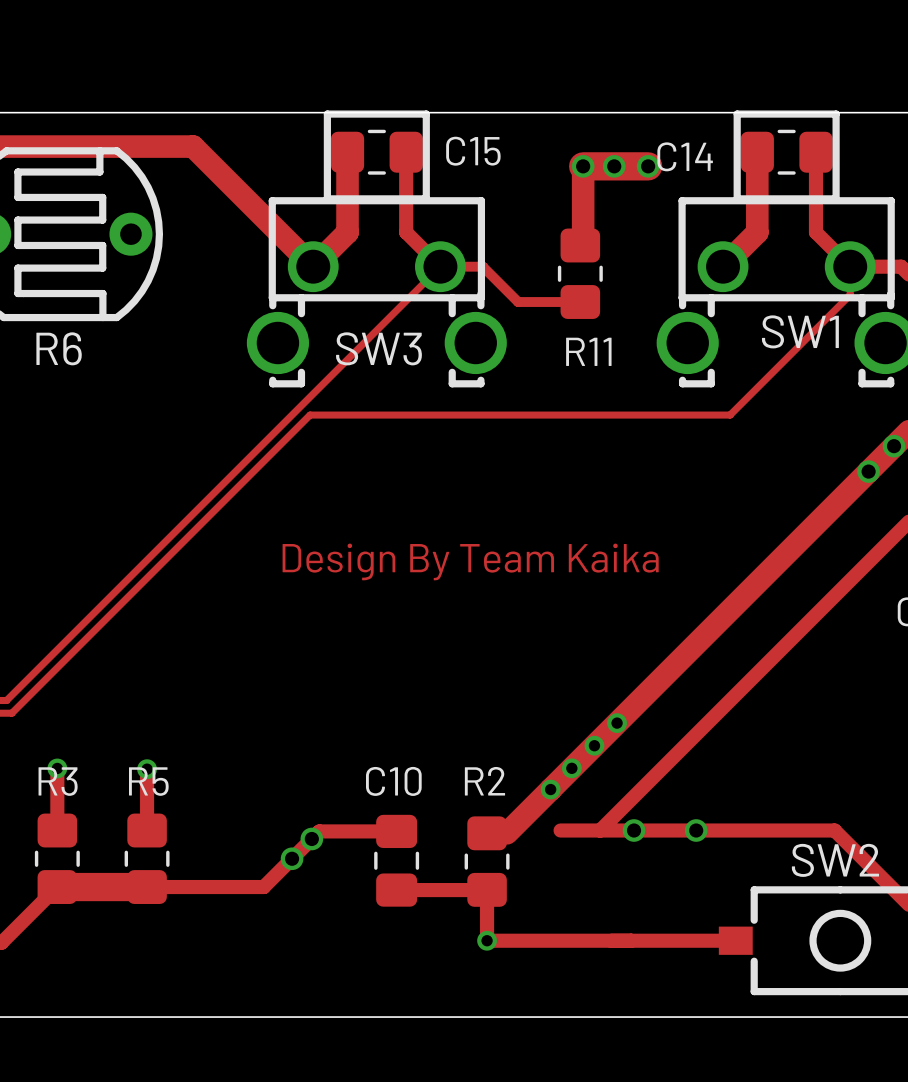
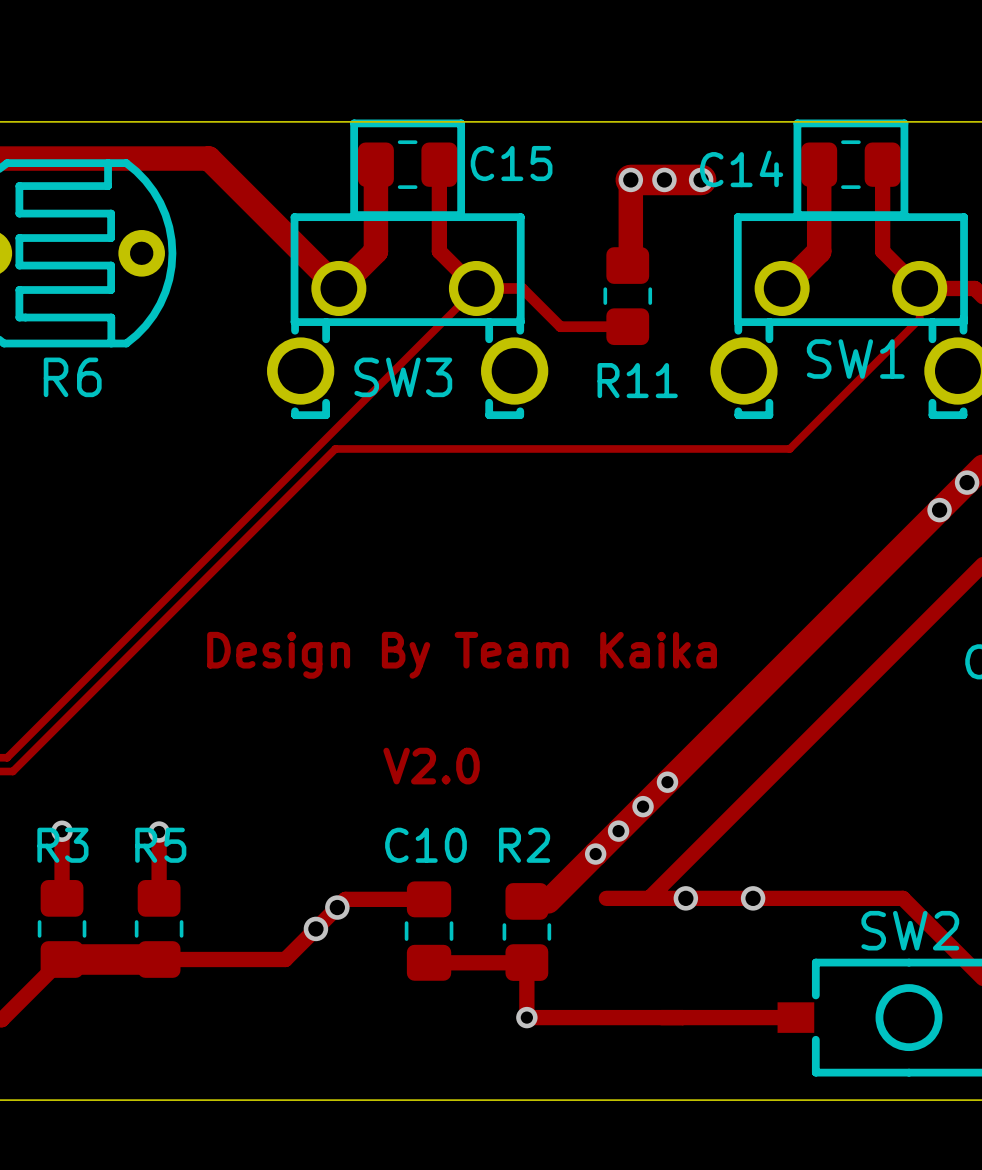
text position: Design By Team Kaika (470, 561) -> Design By Team Kaika (462, 655)
text: none -> V2.0 (431, 766)

